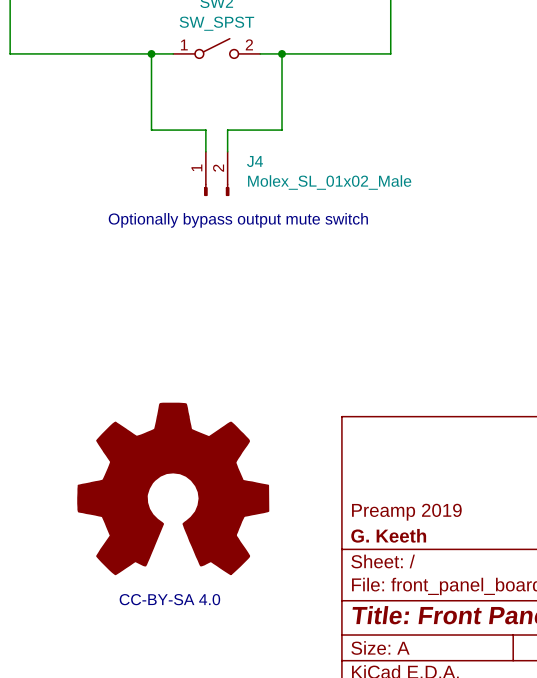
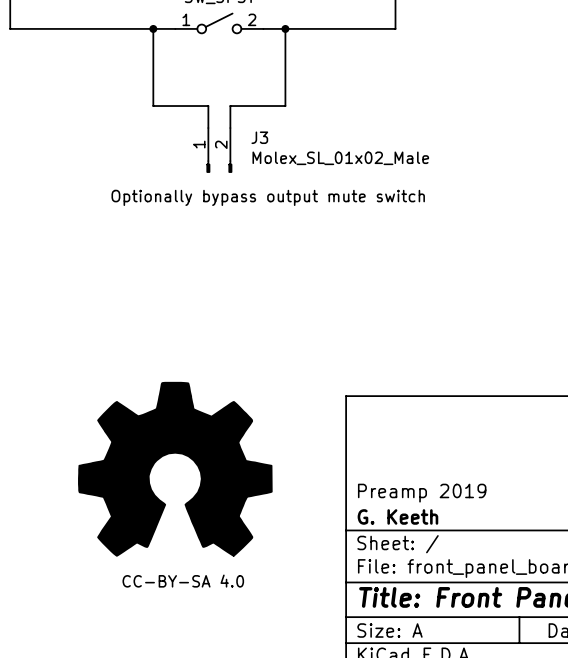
J4 name: J4 (255, 161) -> J3 (259, 137)

